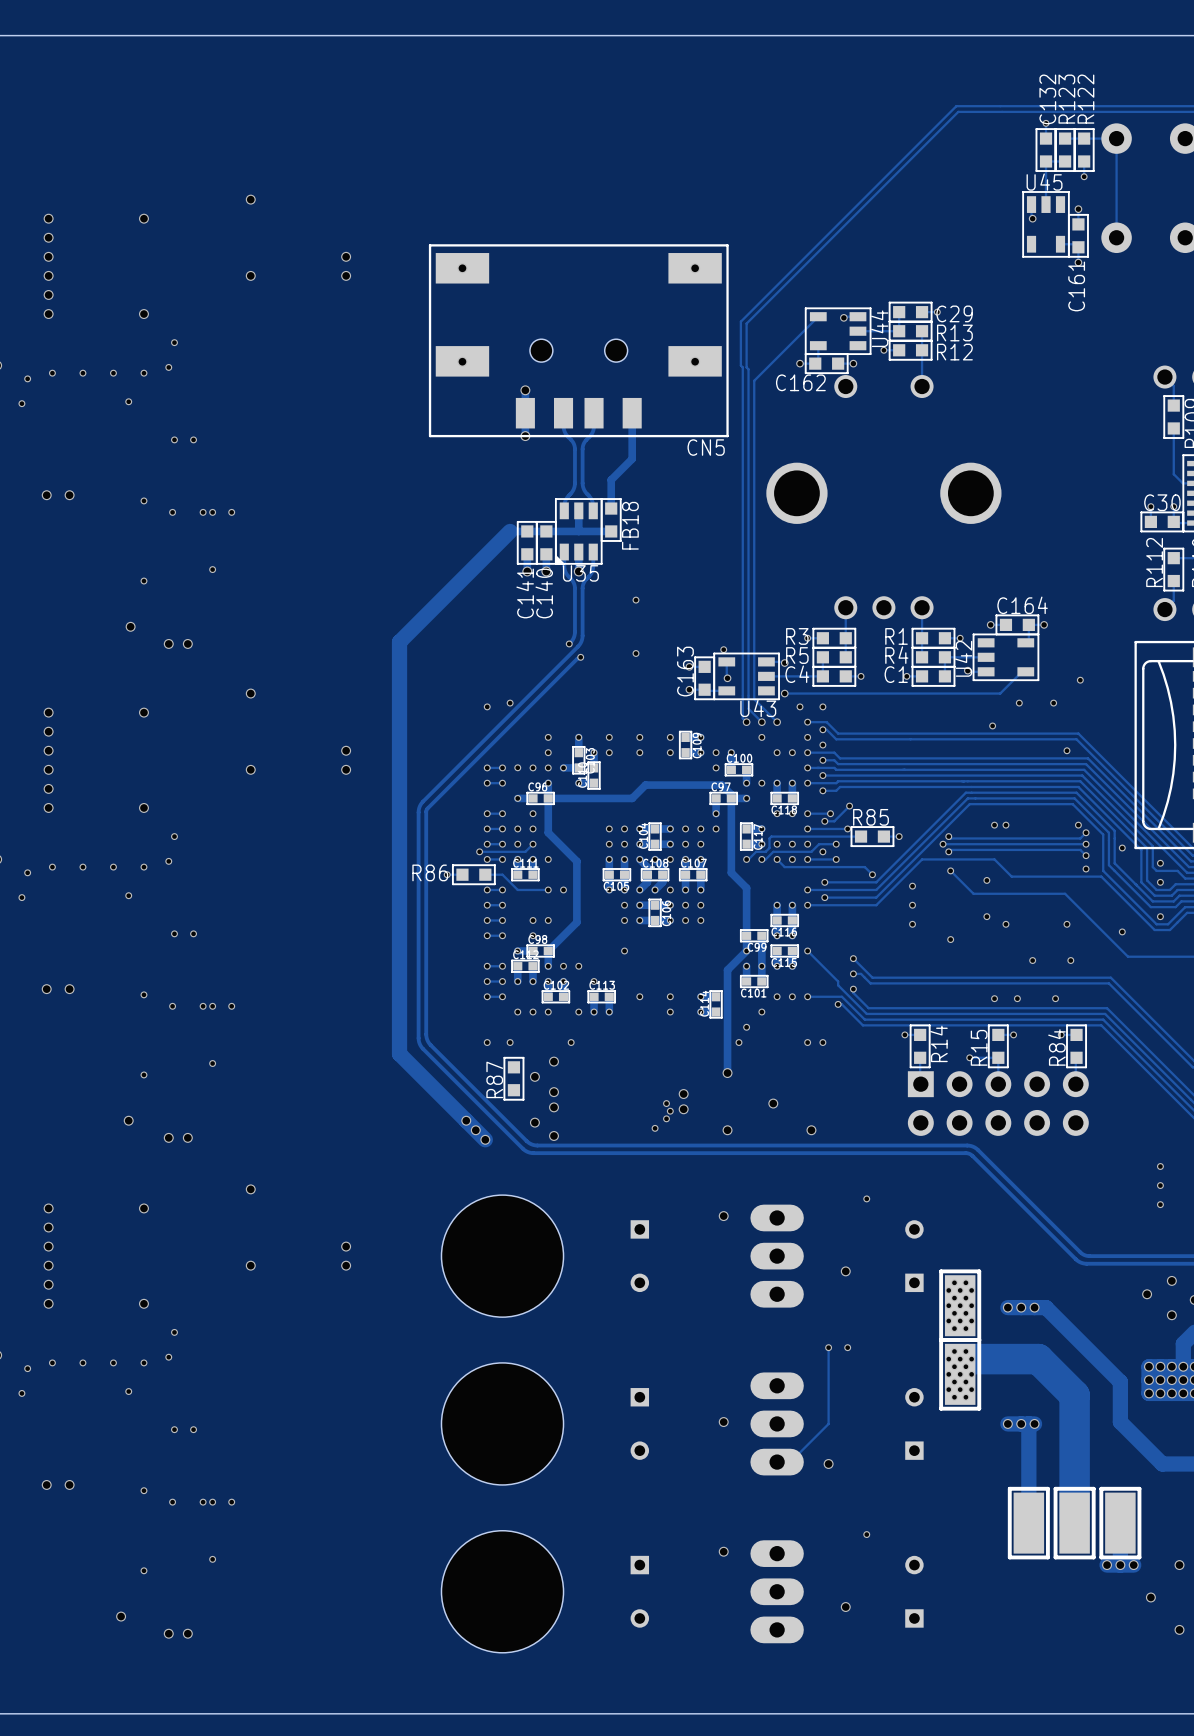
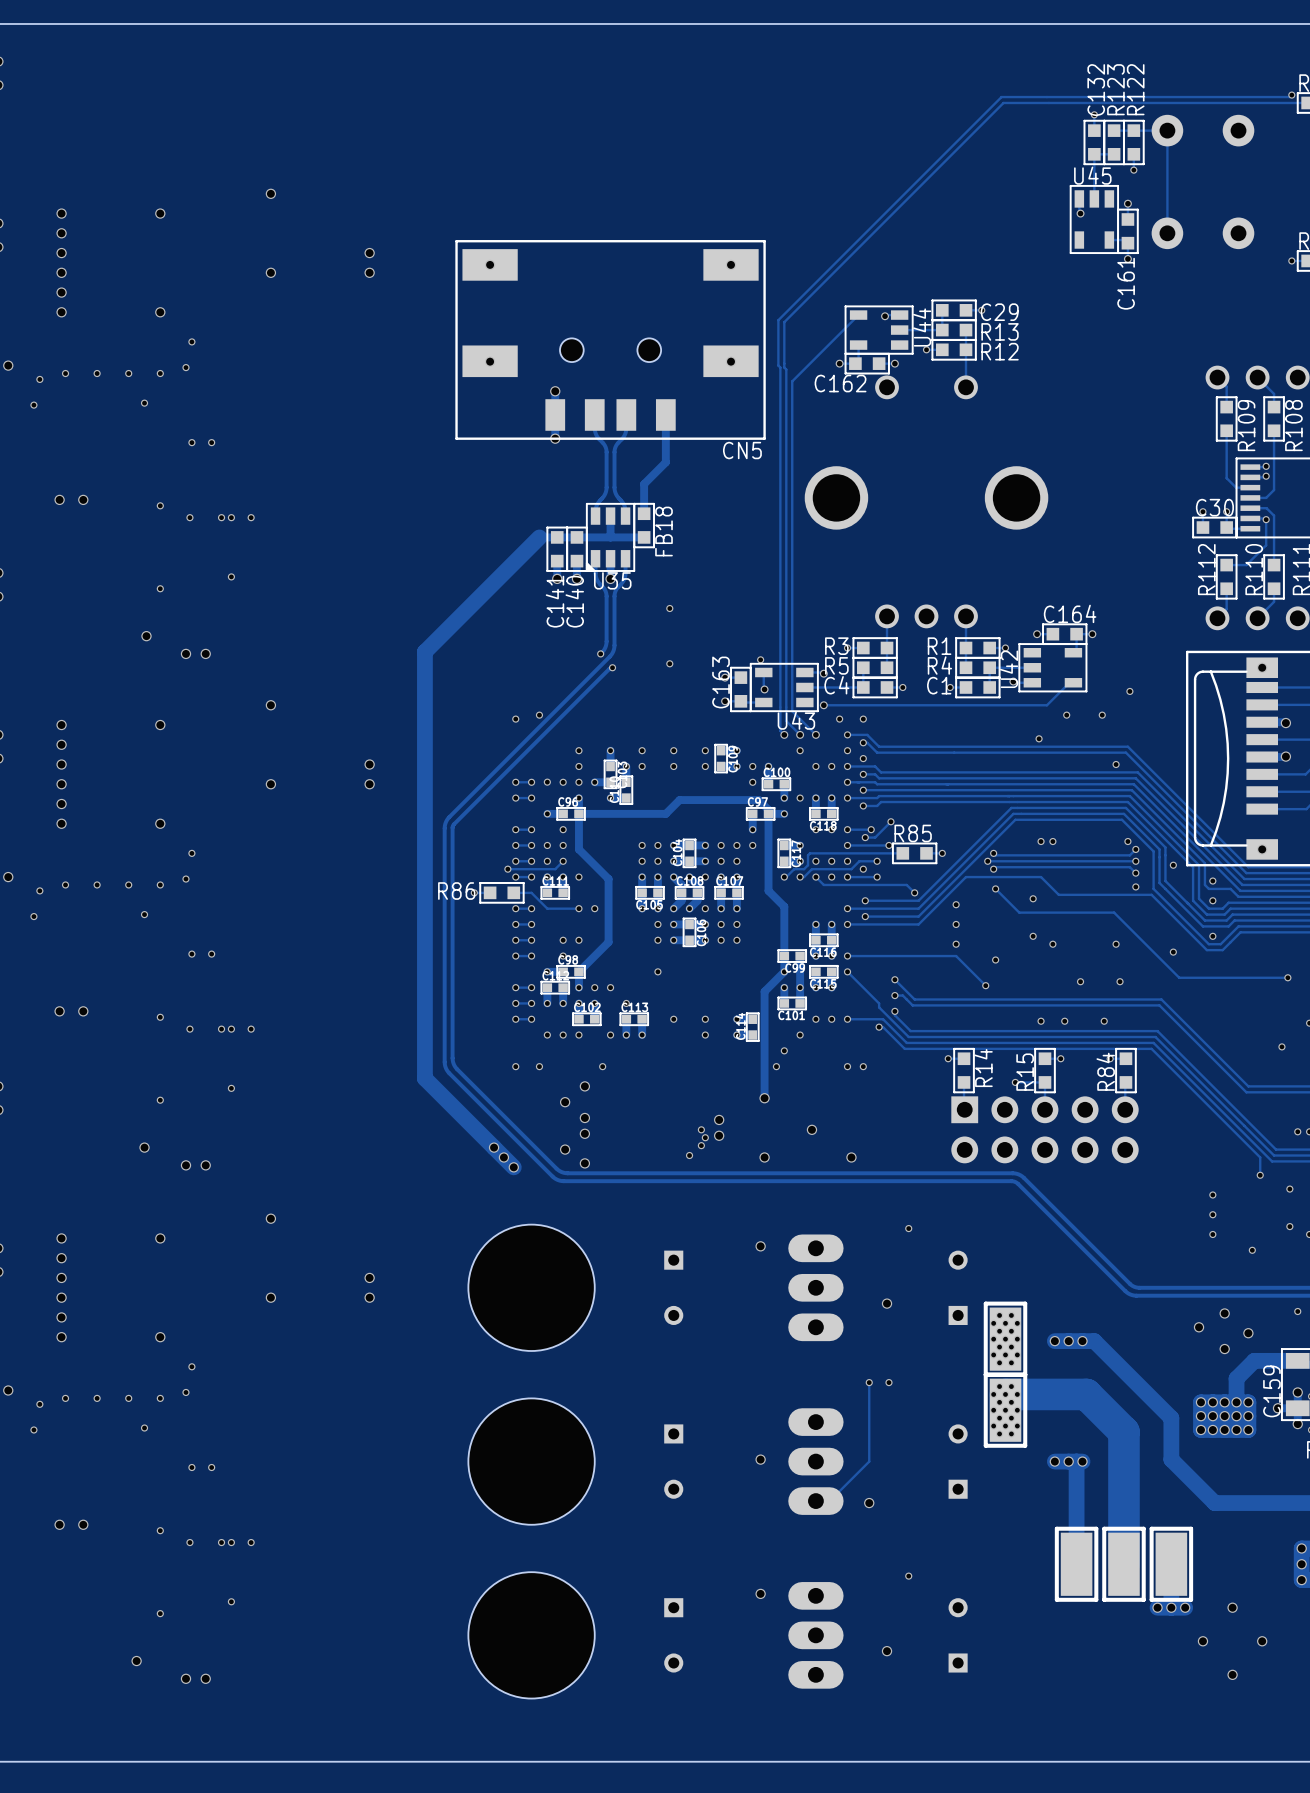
track: none -> (847, 956) (956, 956) (985, 985)
via: none -> (847, 956)
via: none -> (985, 985)
R87: (513, 1078) -> none

